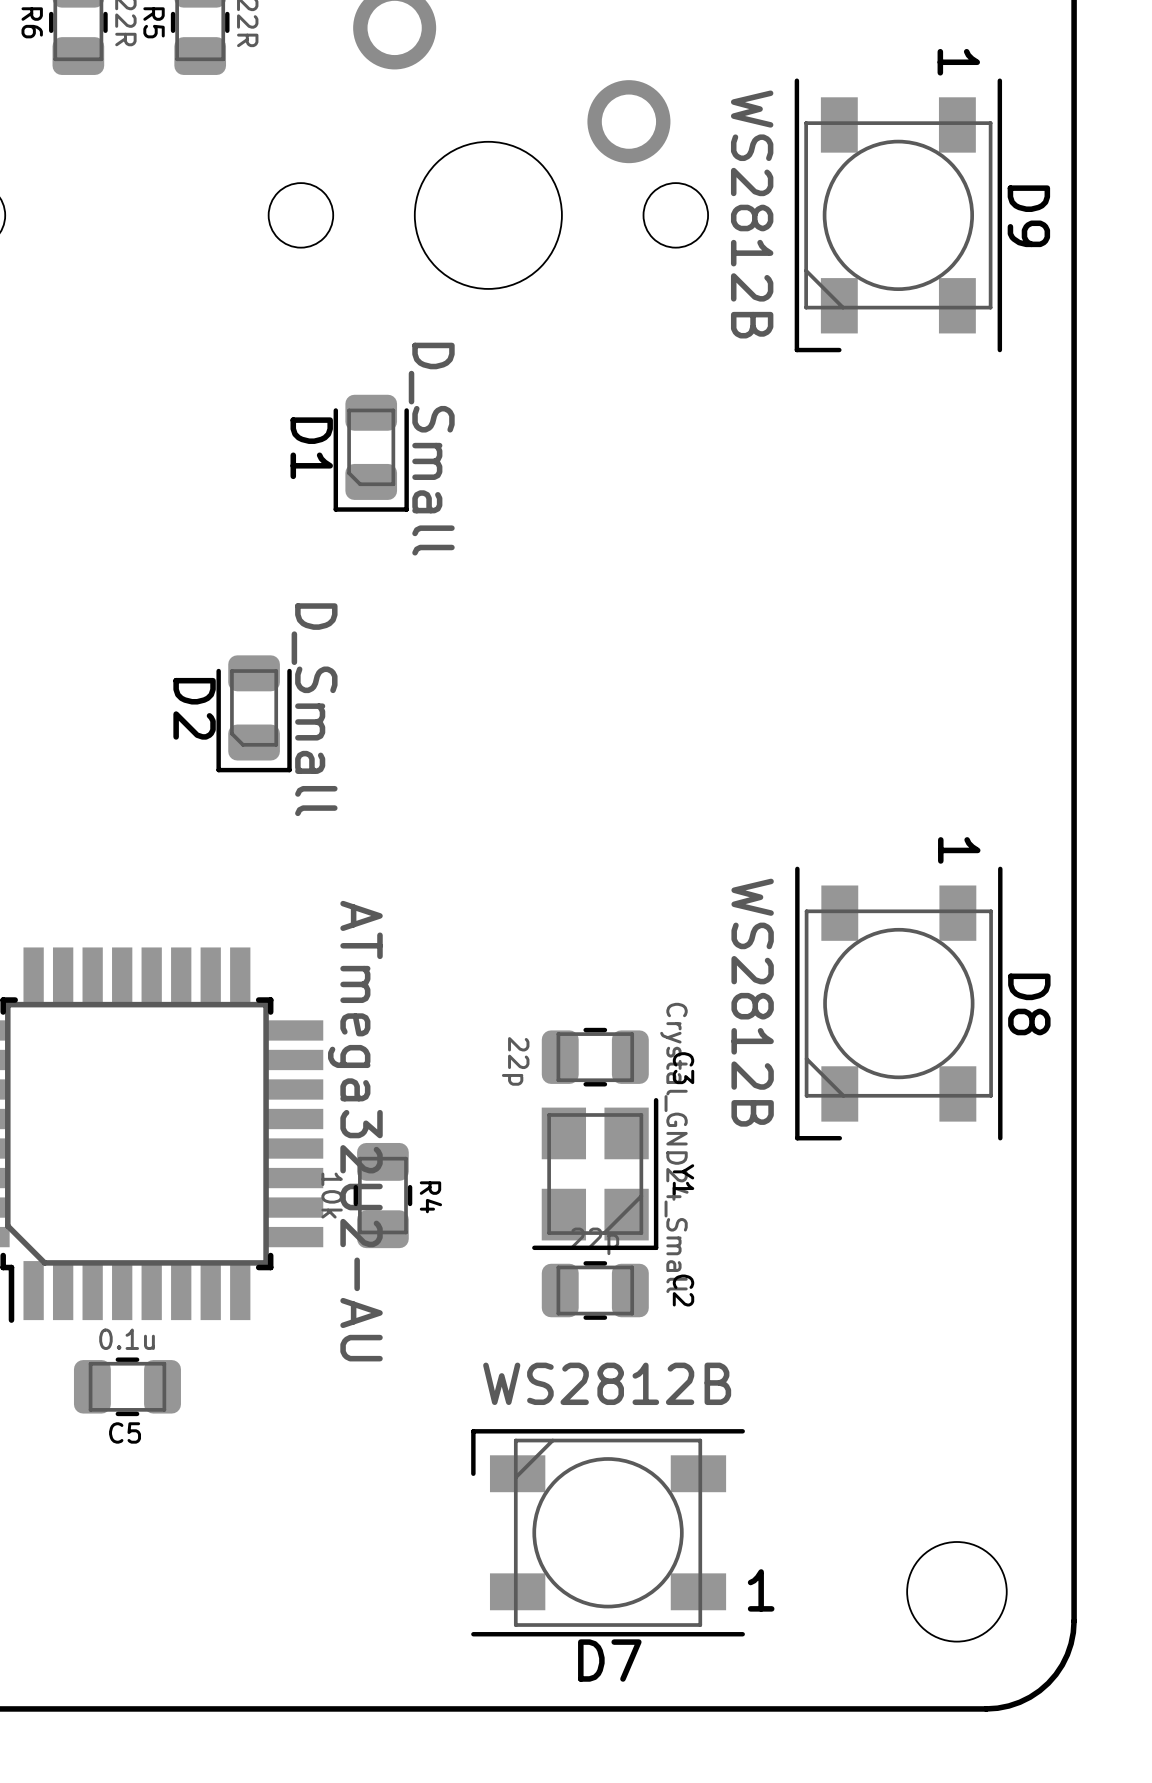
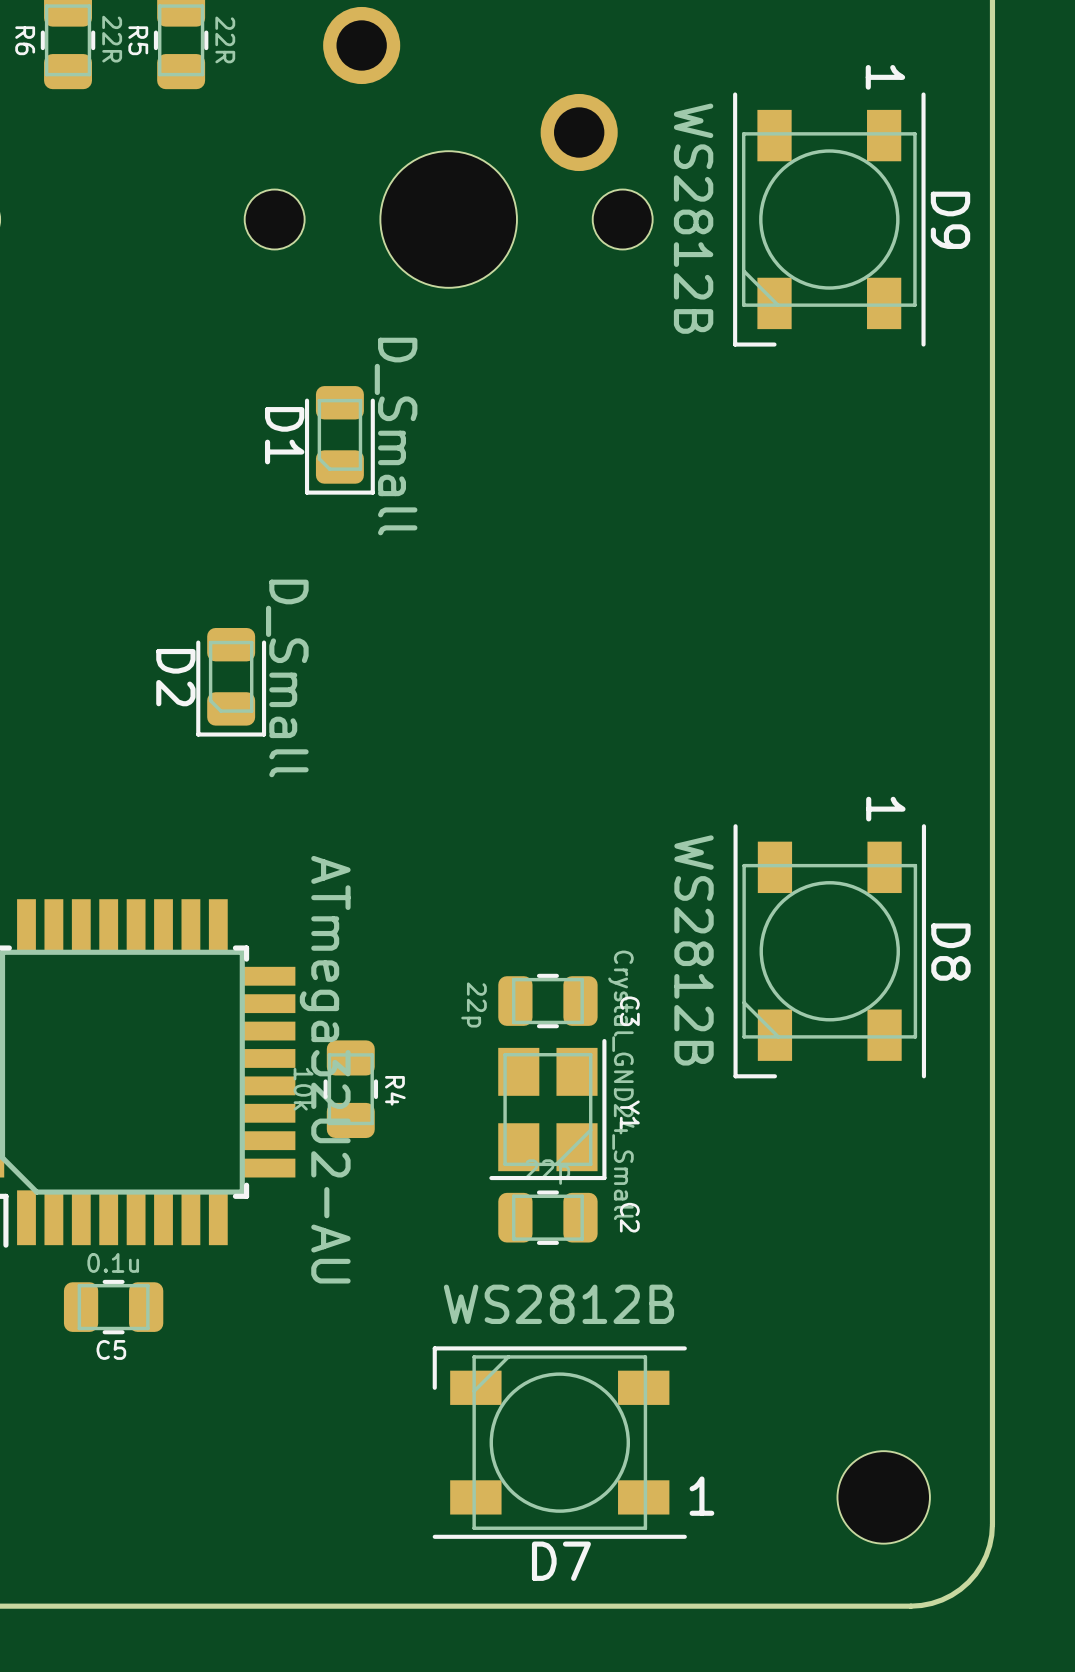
R4 position: (382, 1195) -> (350, 1089)

